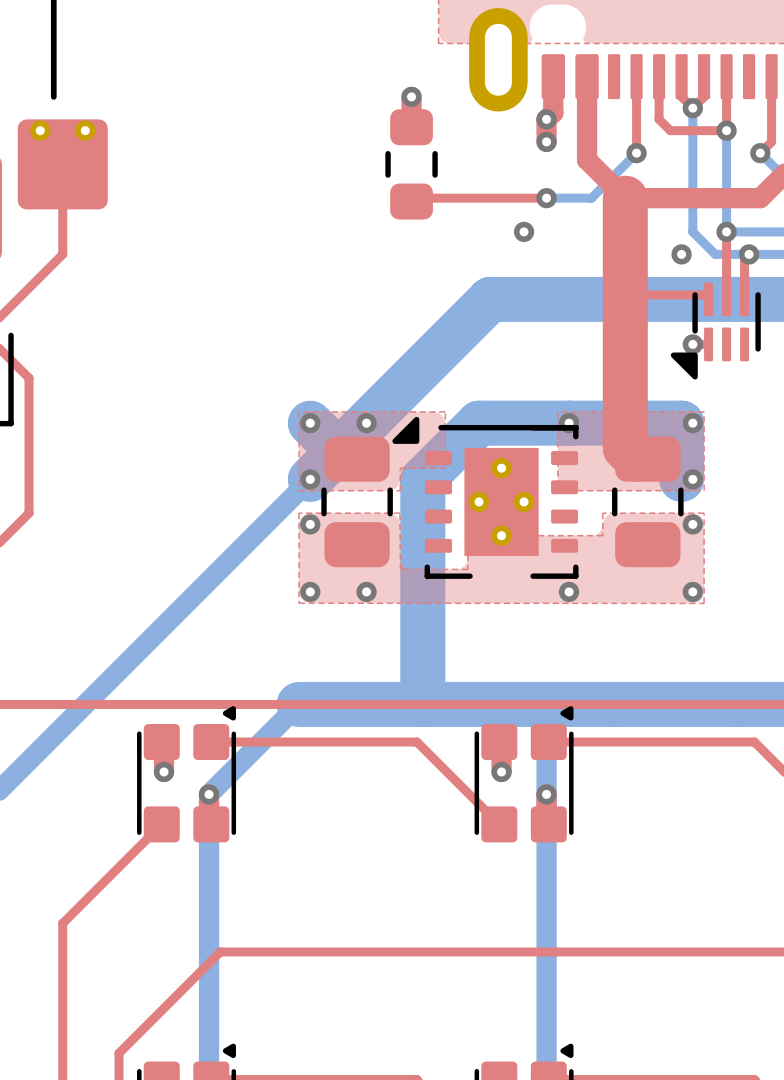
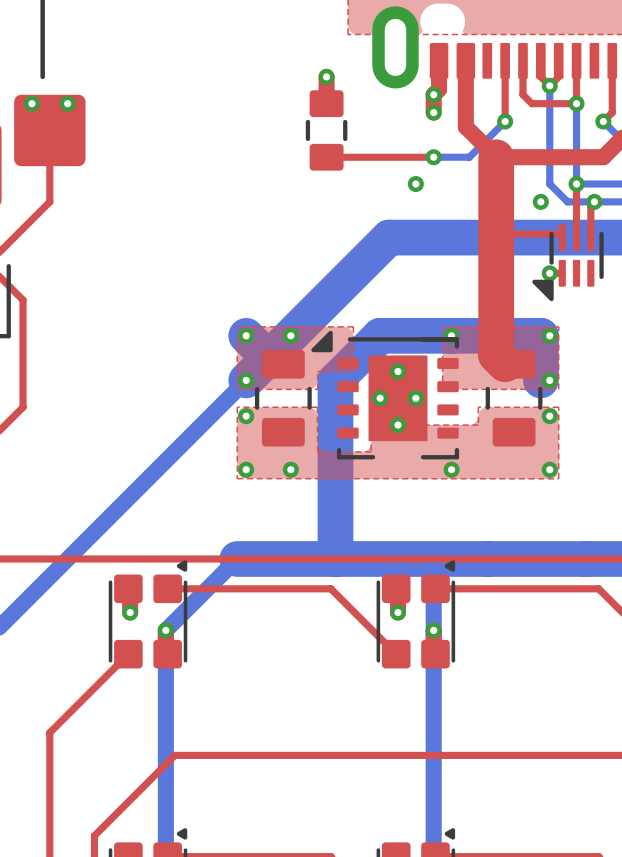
part footprint: [385, 109, 438, 220] -> [305, 90, 348, 171]
part footprint: [321, 436, 393, 568] -> [254, 350, 312, 447]
part footprint: [612, 436, 684, 568] -> [485, 350, 543, 447]

